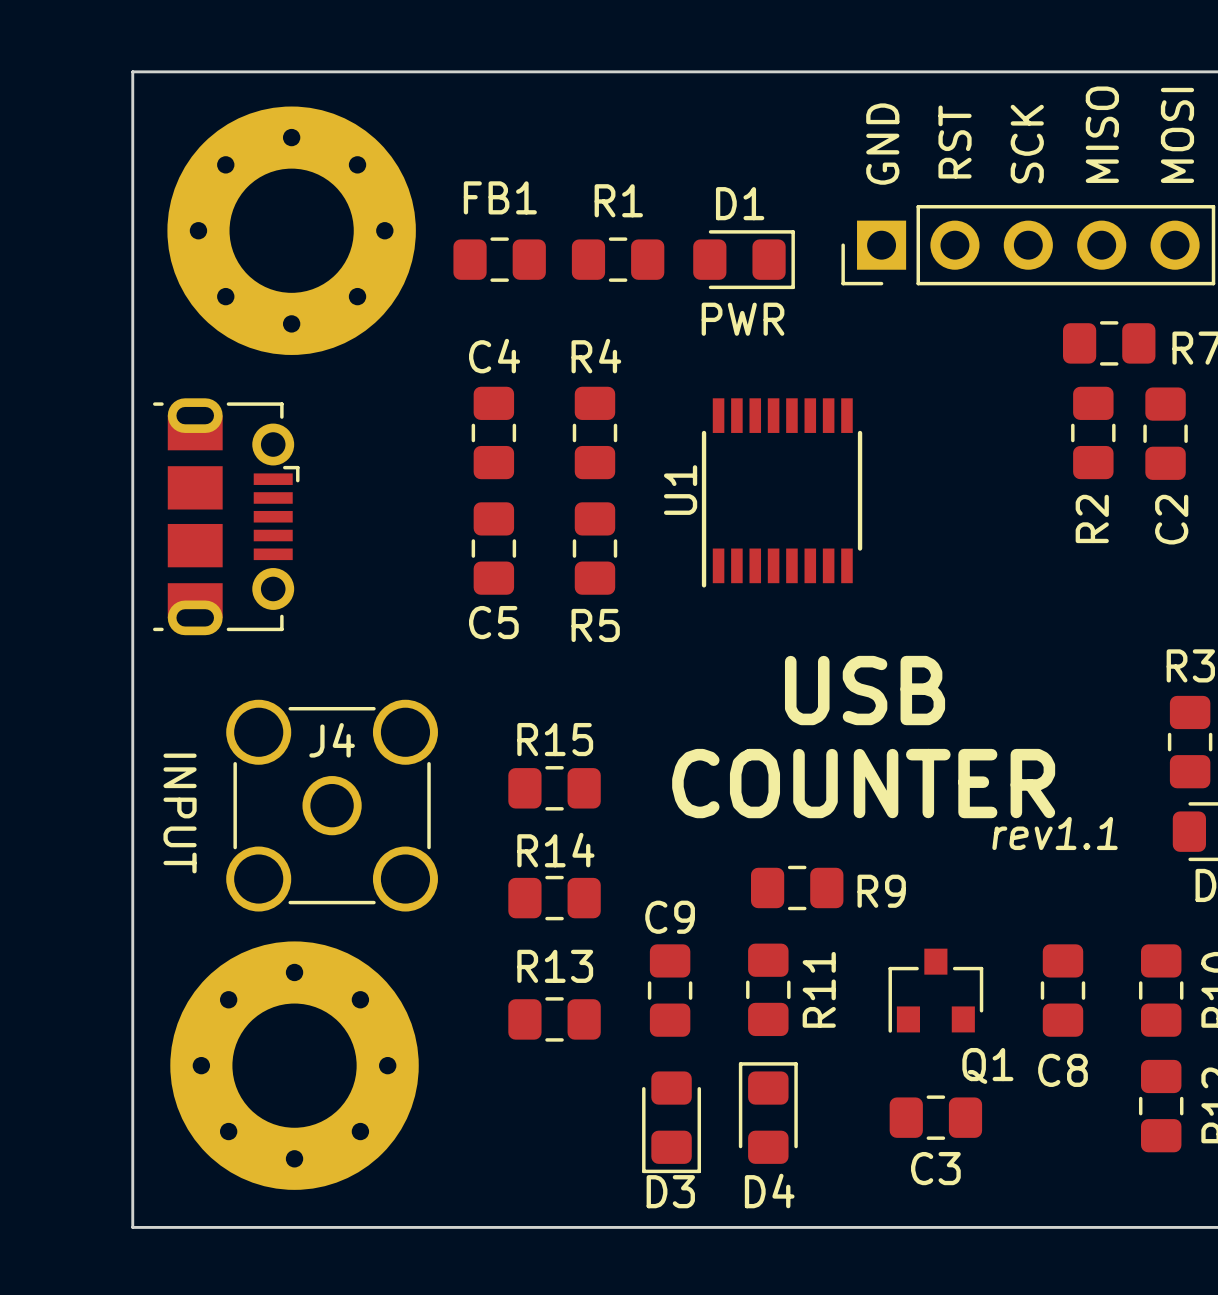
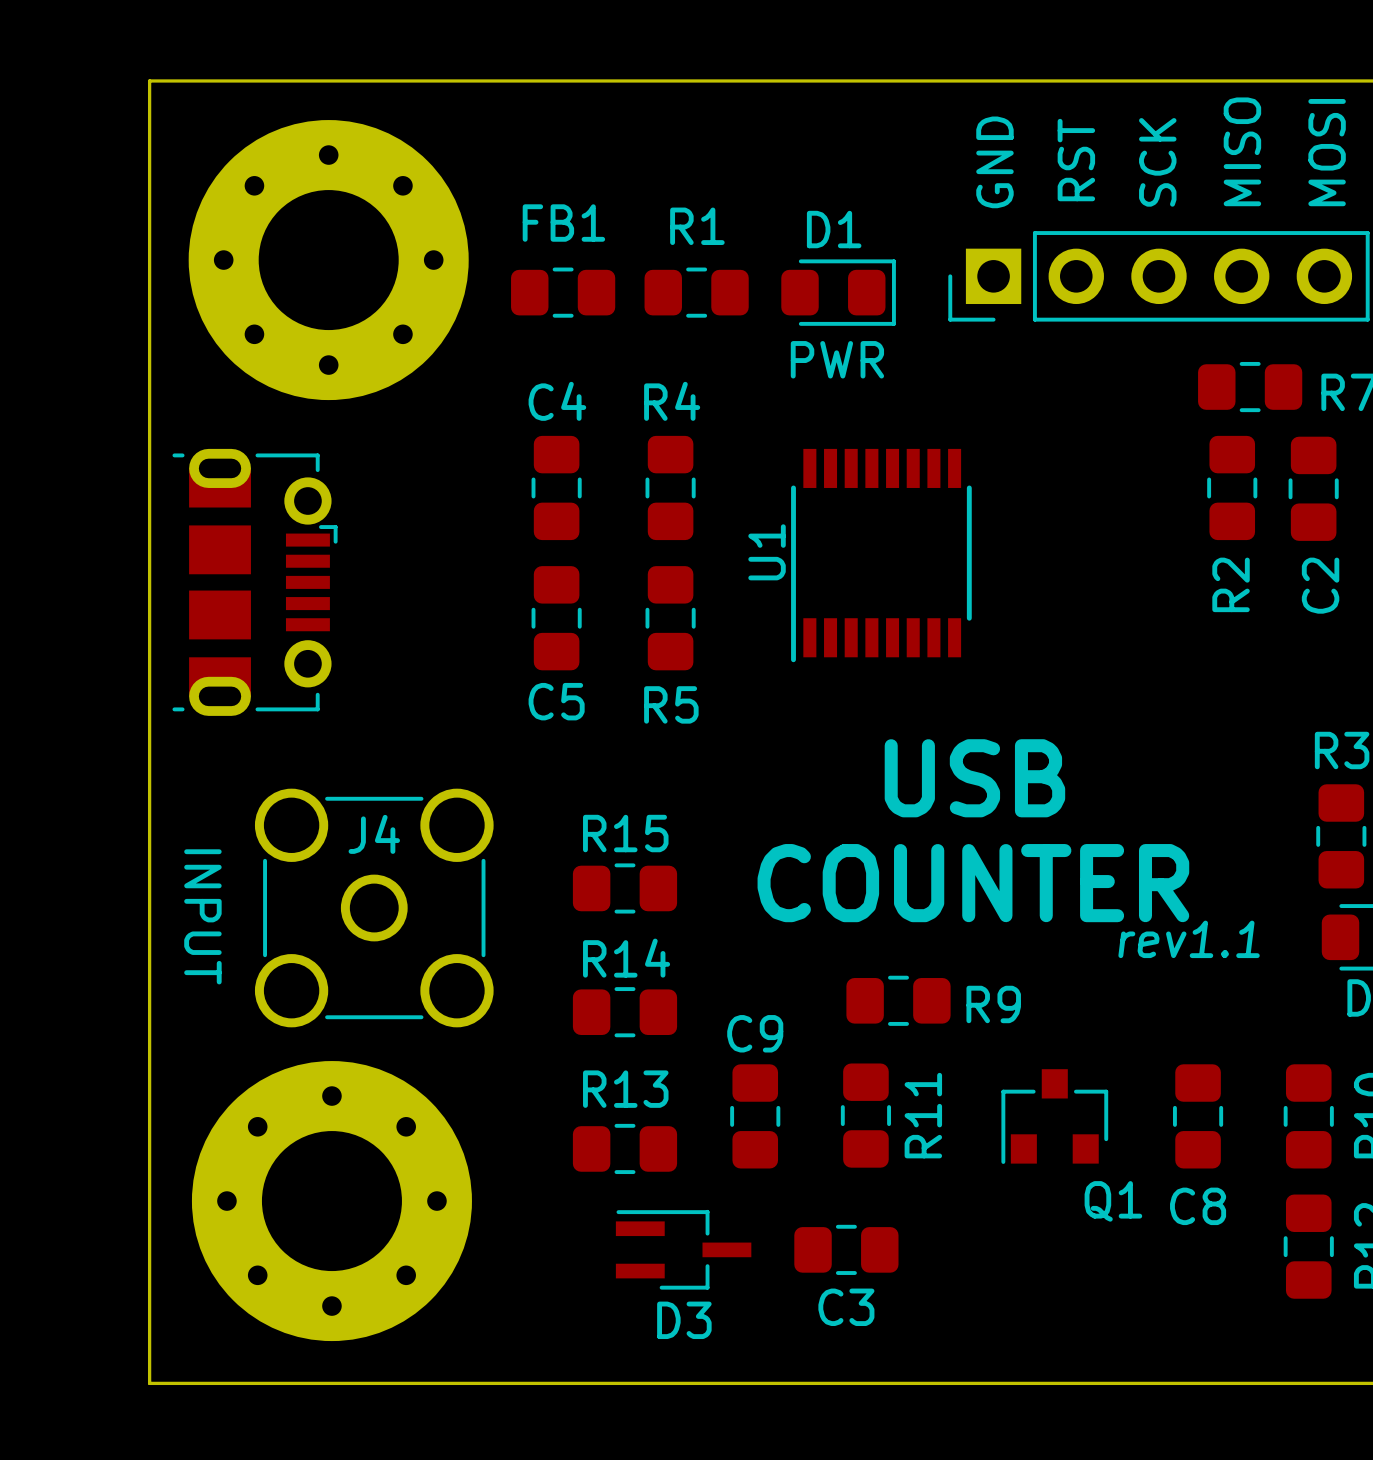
D3 footprint: [642, 1071, 702, 1174] -> [615, 1209, 752, 1290]
D4: (768, 1113) -> none
C3 position: (935, 1117) -> (846, 1249)

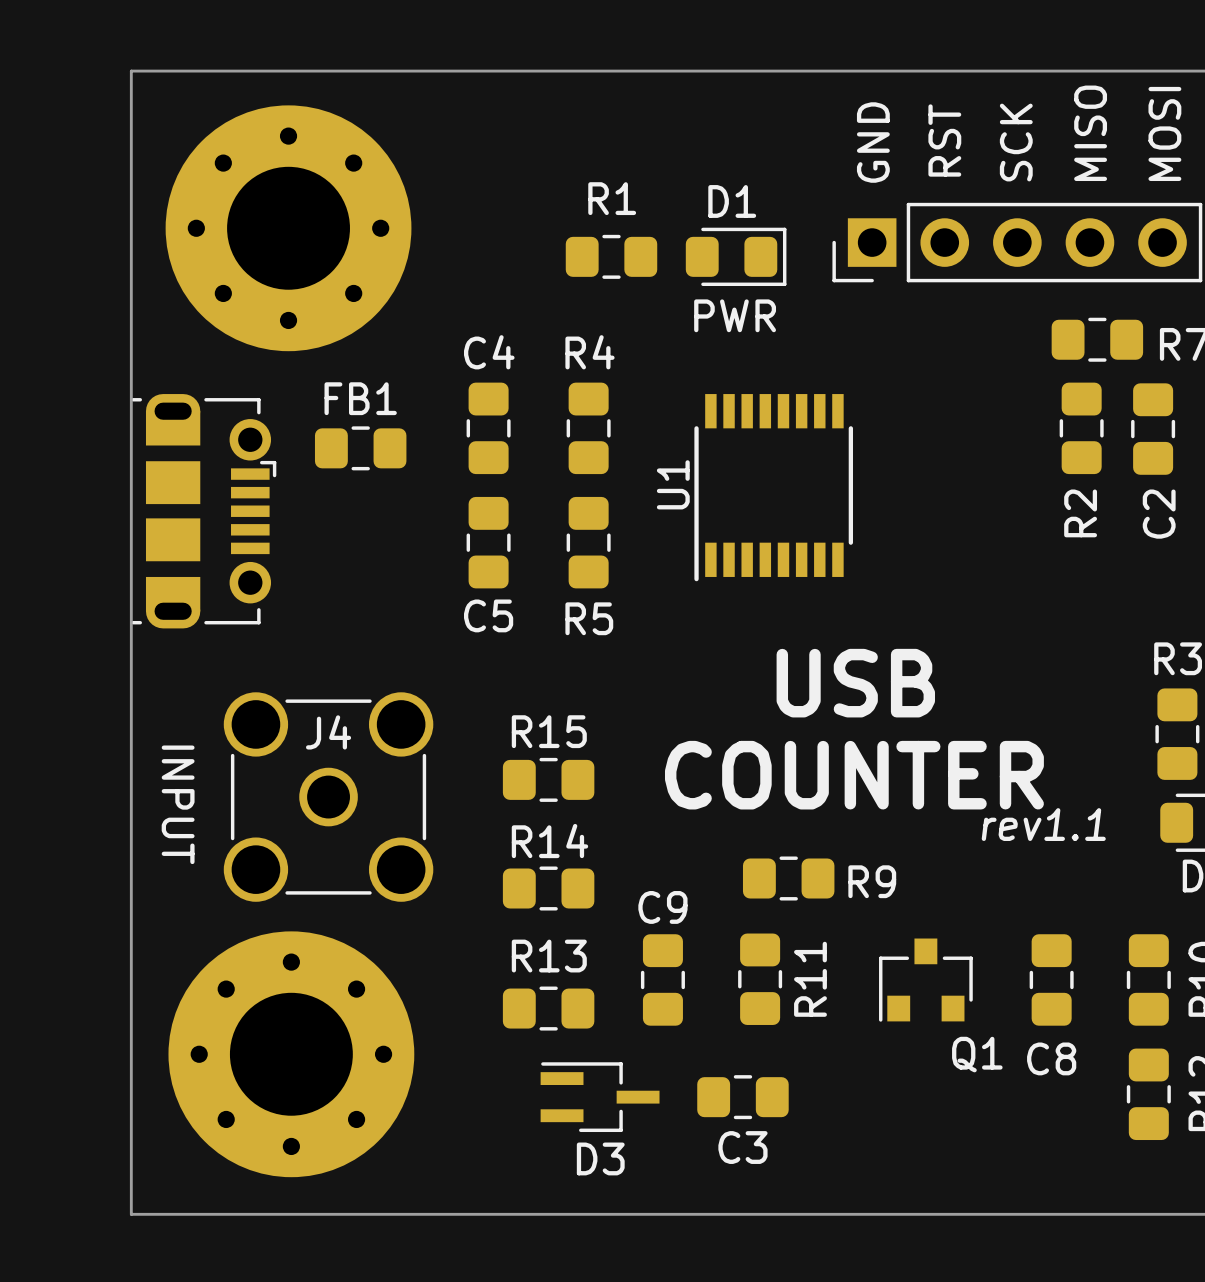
FB1 name position: FB1 (563, 223) -> FB1 (360, 398)
FB1 position: (563, 292) -> (360, 448)
part footprint: [172, 448, 338, 716] -> [131, 394, 277, 629]

